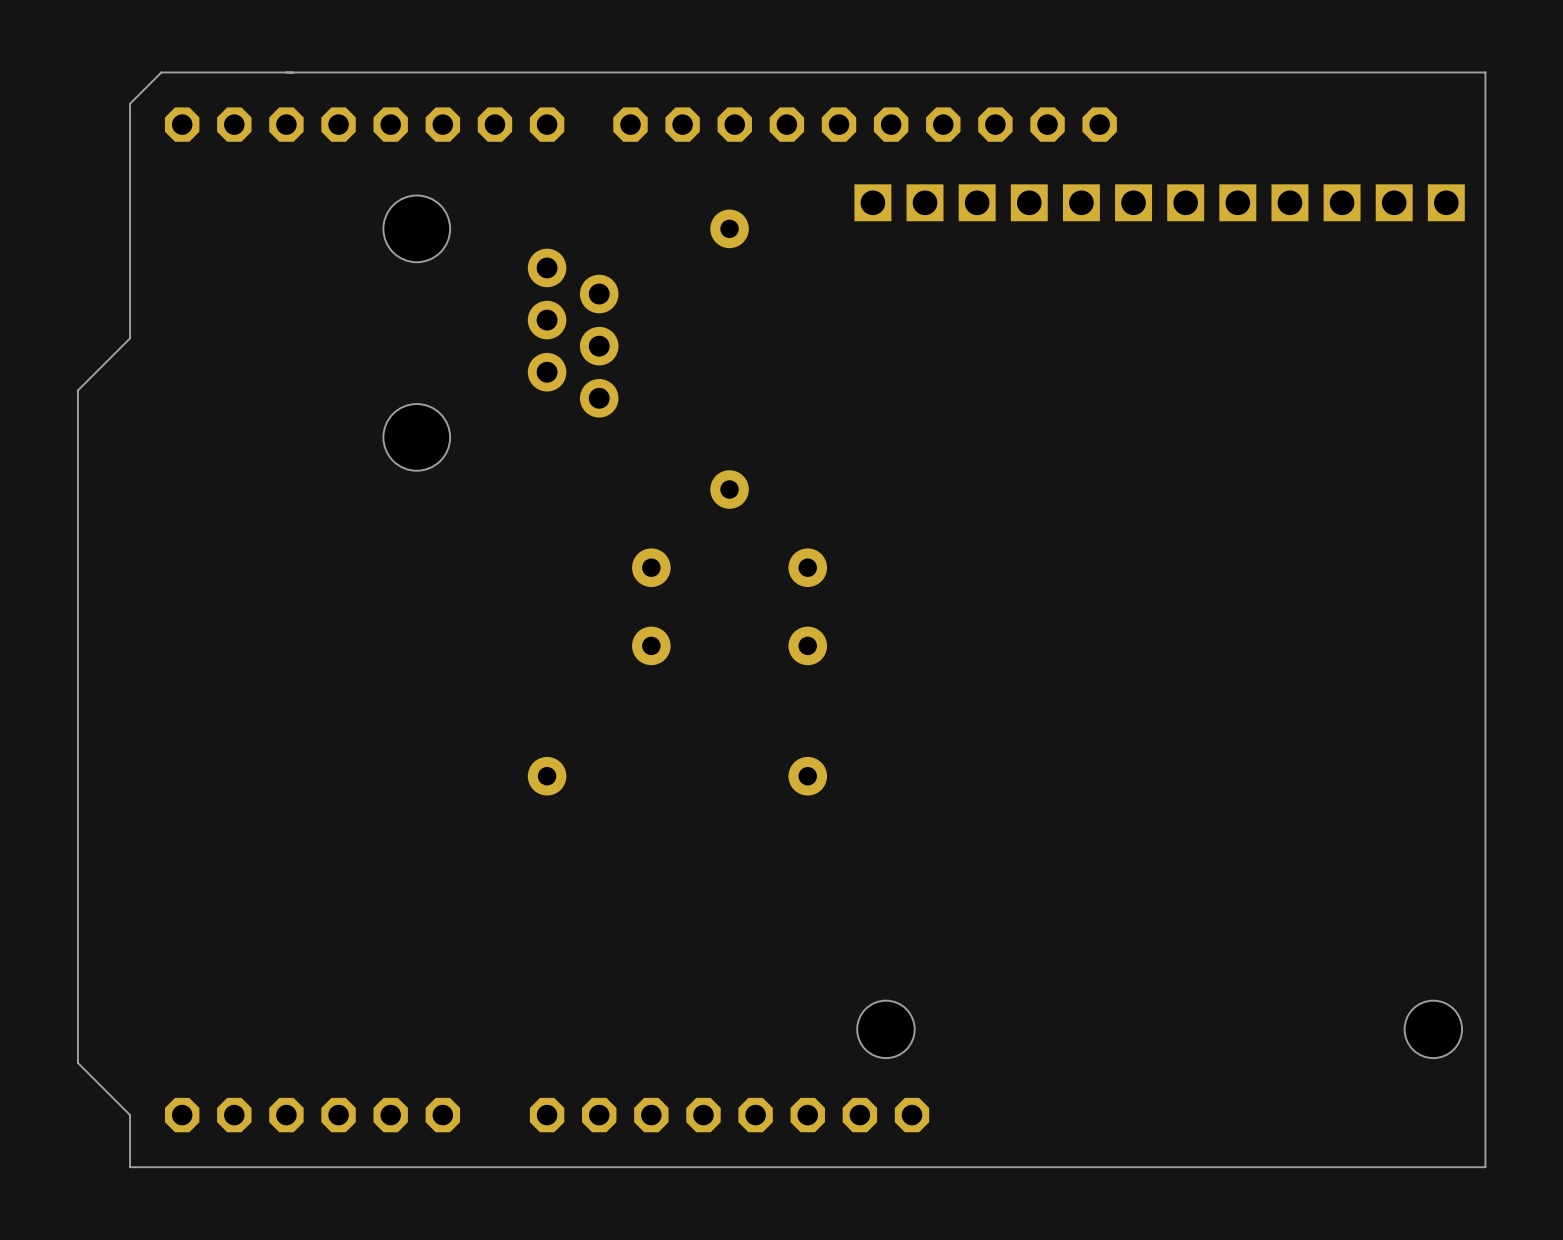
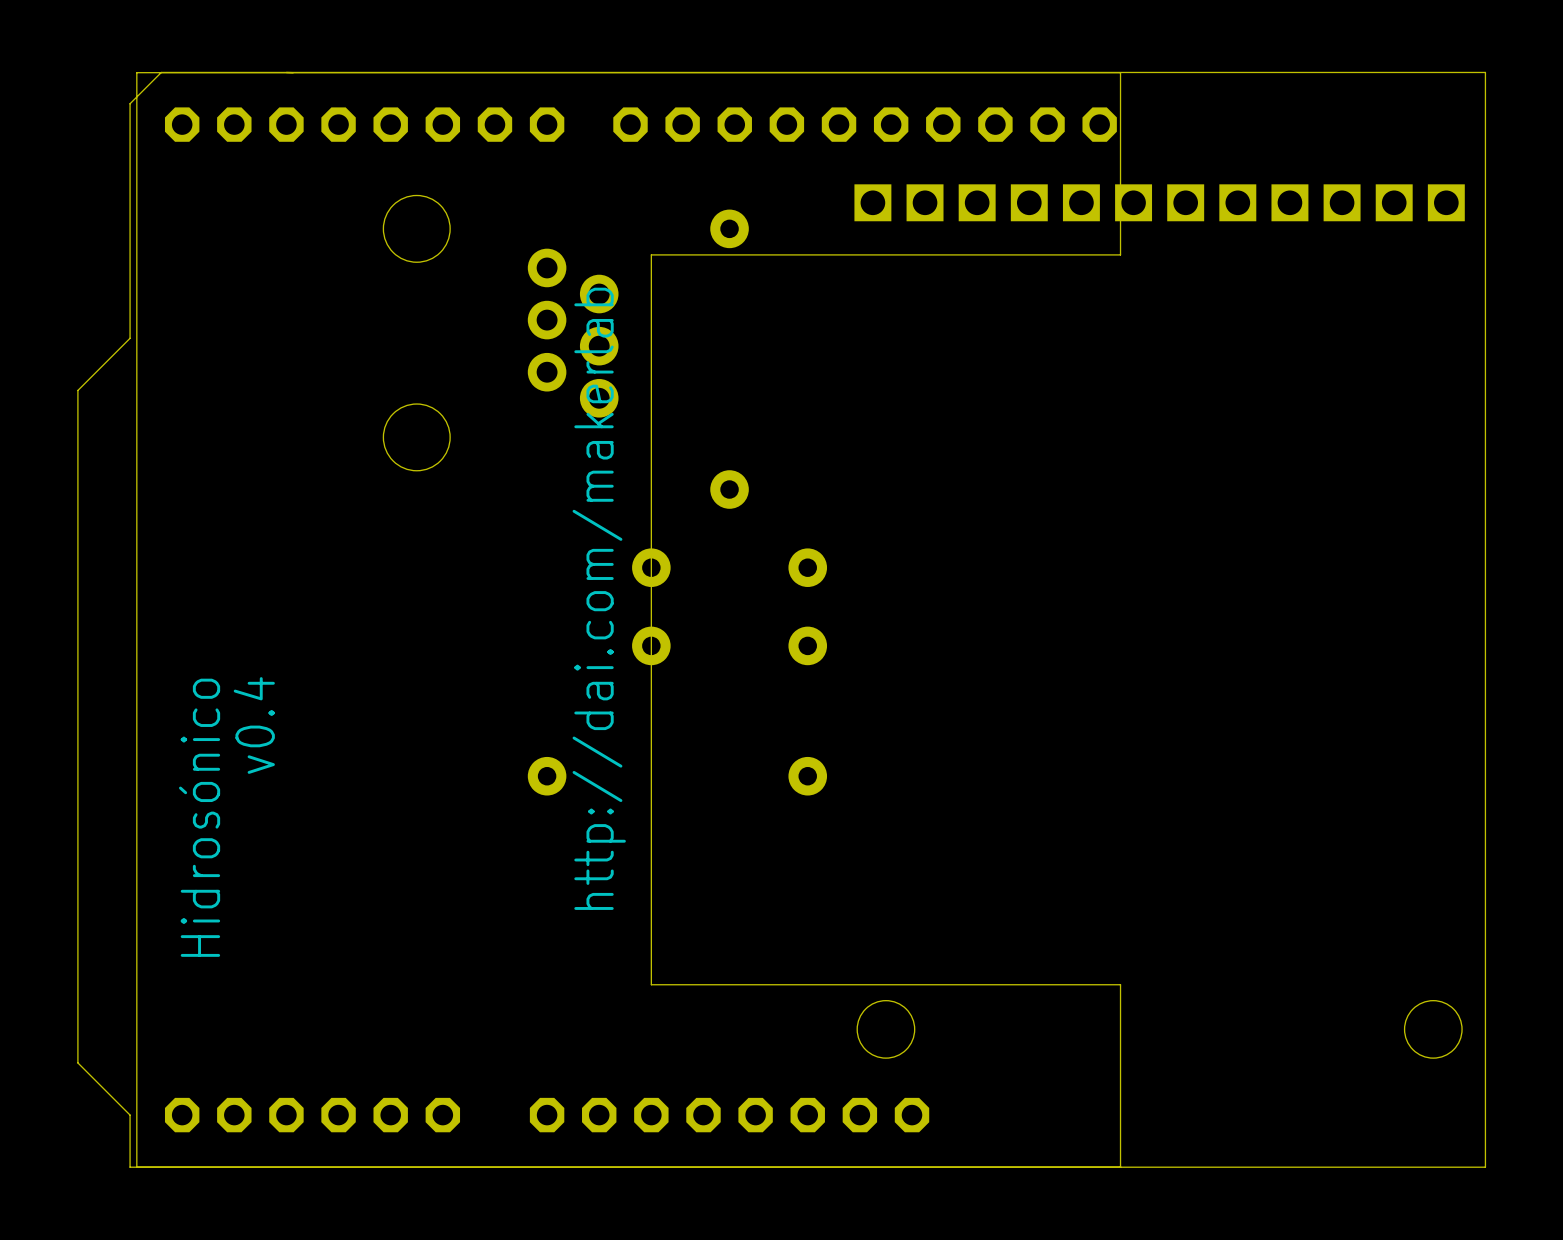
board edge: none -> (1120, 72) (1120, 254) (651, 254) (651, 984) (1120, 984) (1120, 1167) (136, 1167) (136, 72) (1120, 72)
text: none -> http://dai.com/makerlab (599, 598)
text: none -> v0.4 (254, 725)
text: none -> Hidrosónico (199, 817)

